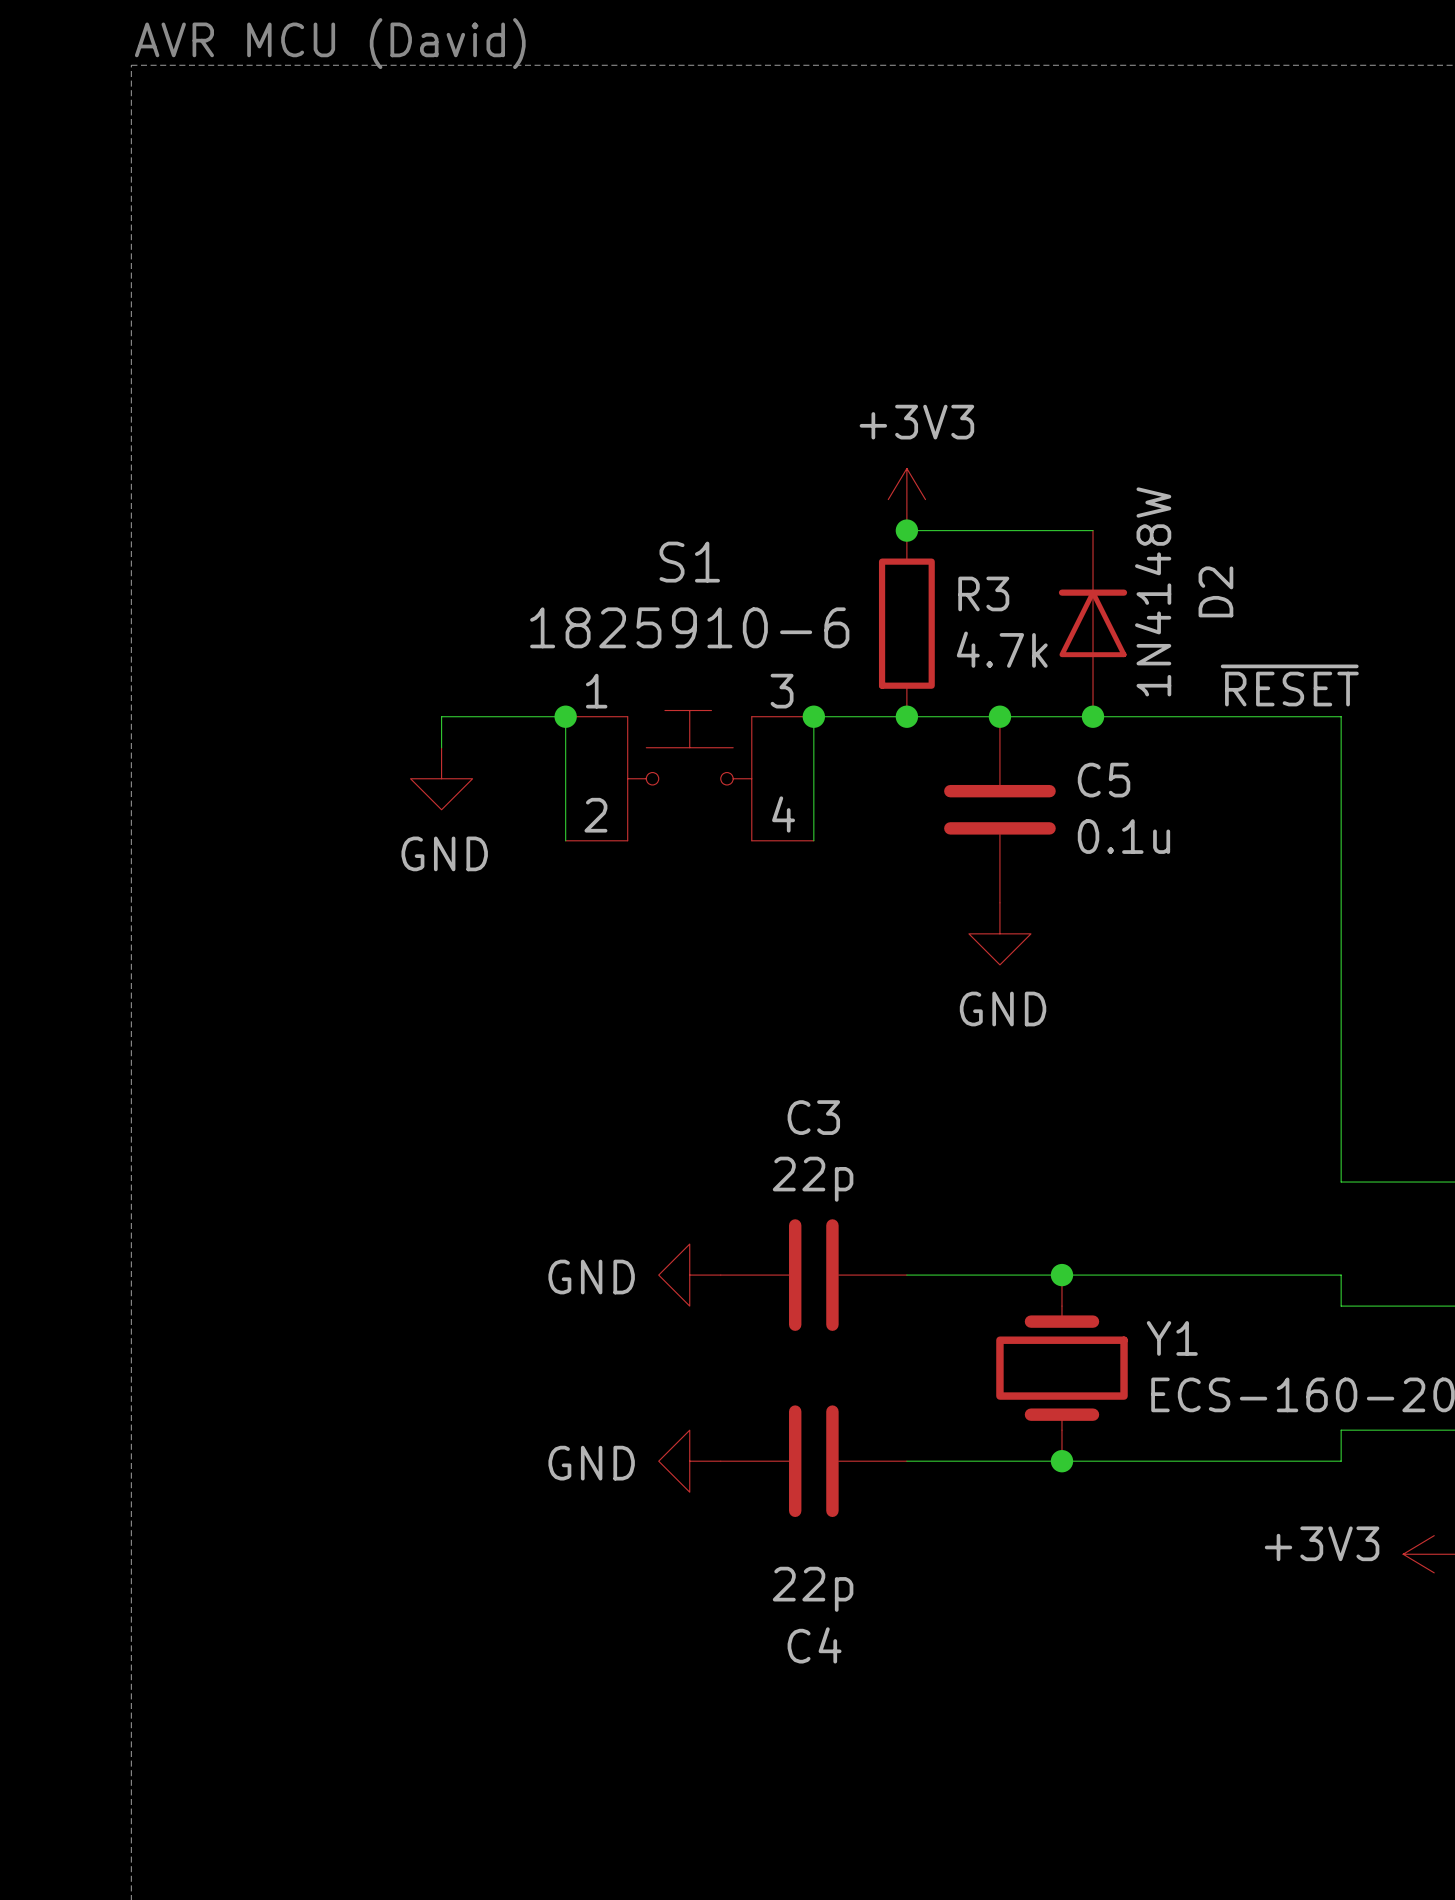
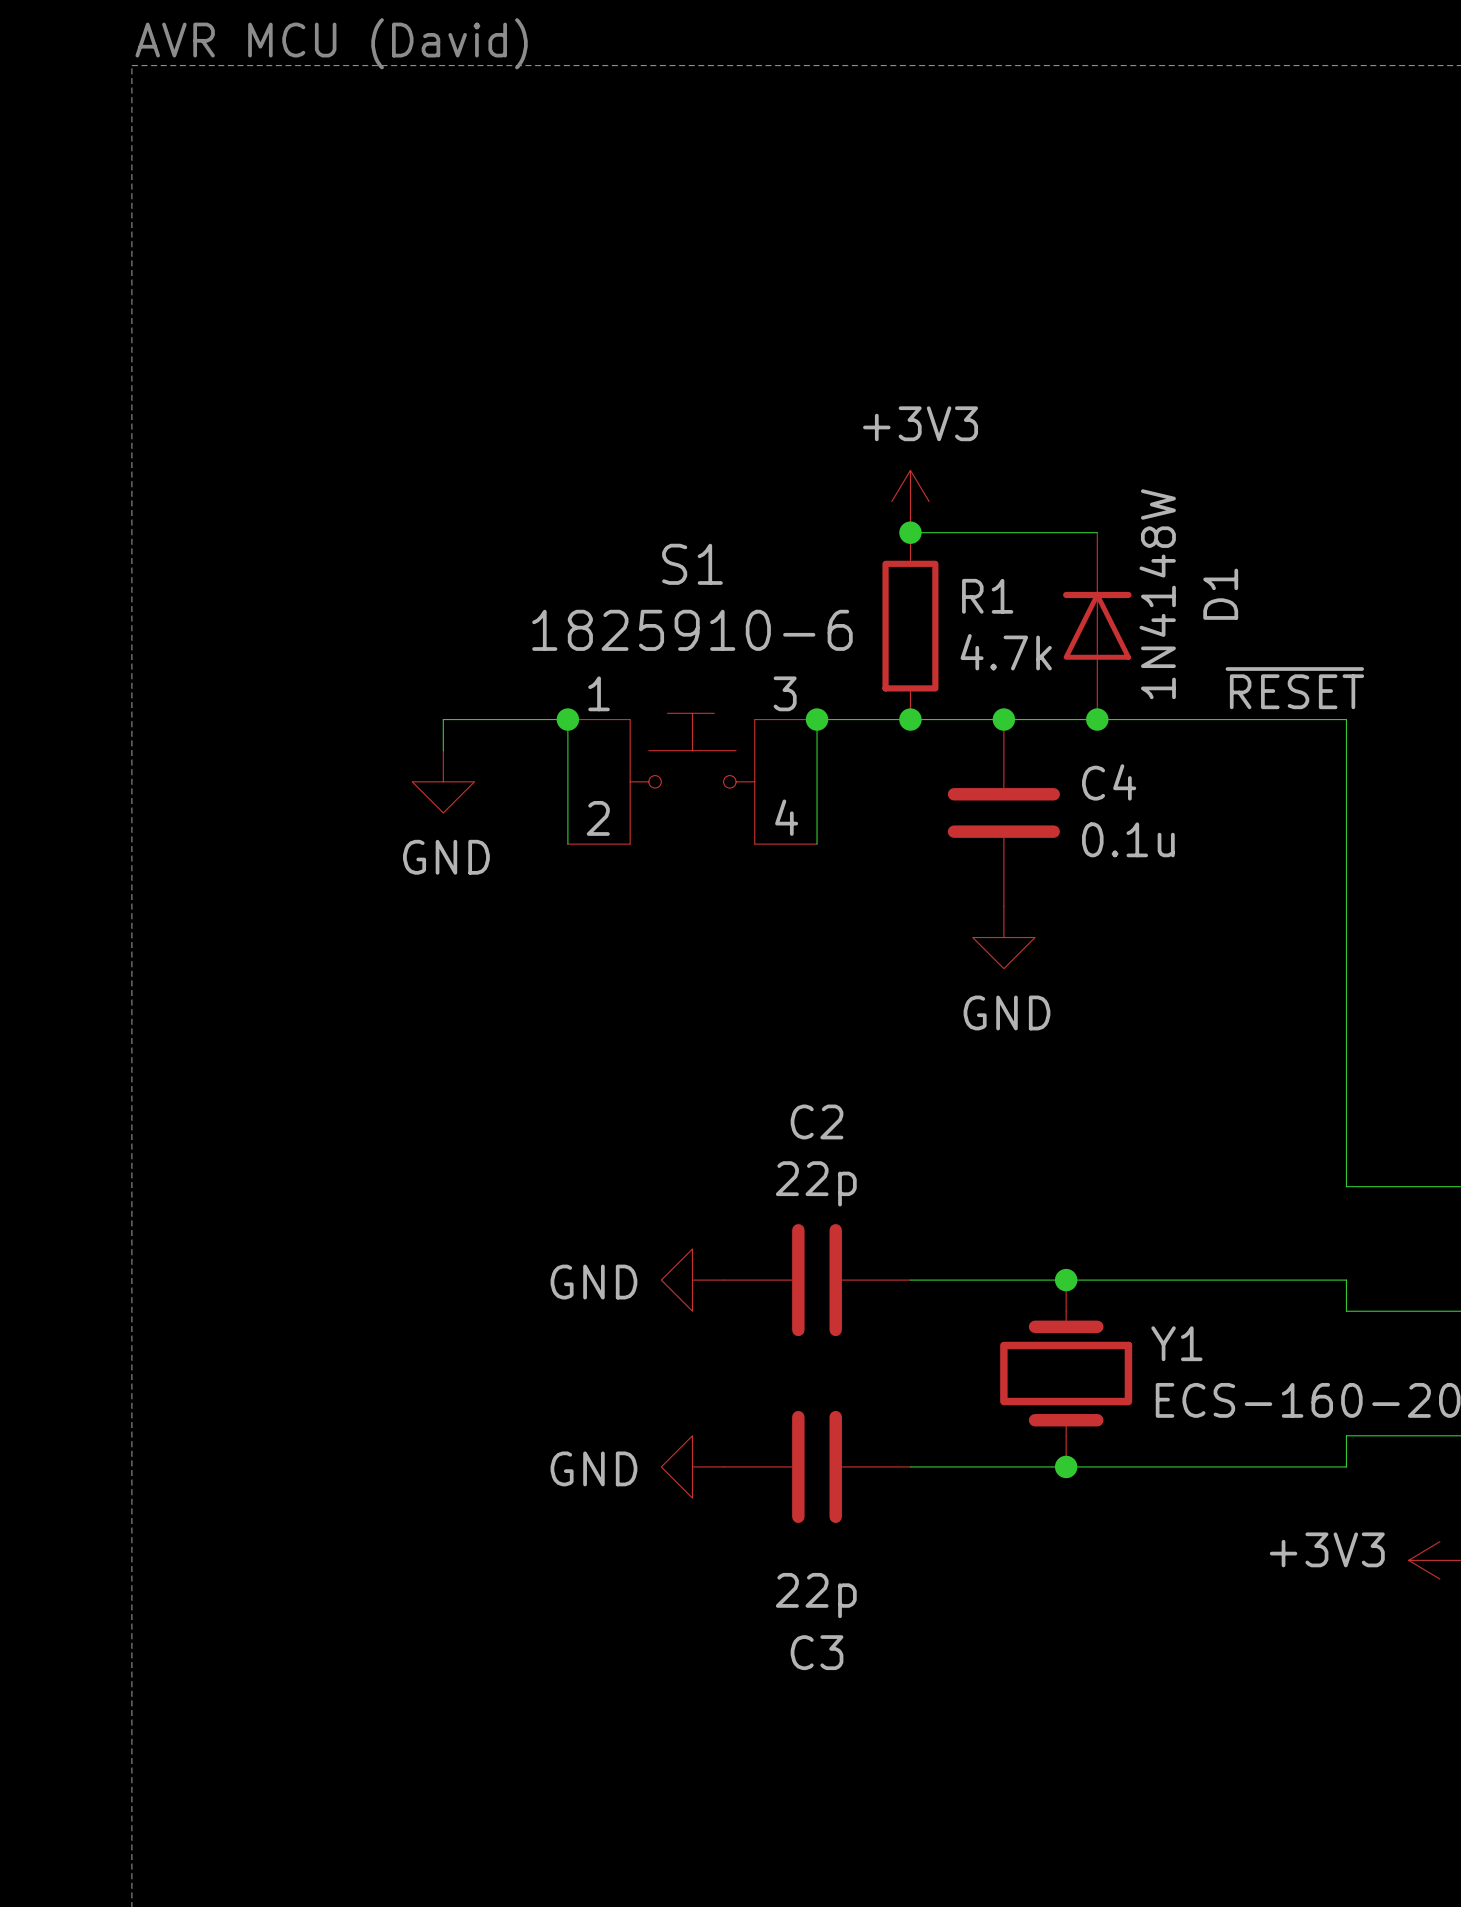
D2 name: D2 (1215, 591) -> D1 (1220, 594)
R3 name: R3 (983, 593) -> R1 (987, 596)
C5 name: C5 (1104, 780) -> C4 (1109, 782)
C3 name: C3 (813, 1117) -> C2 (817, 1121)
C4 name: C4 (814, 1645) -> C3 (817, 1652)

